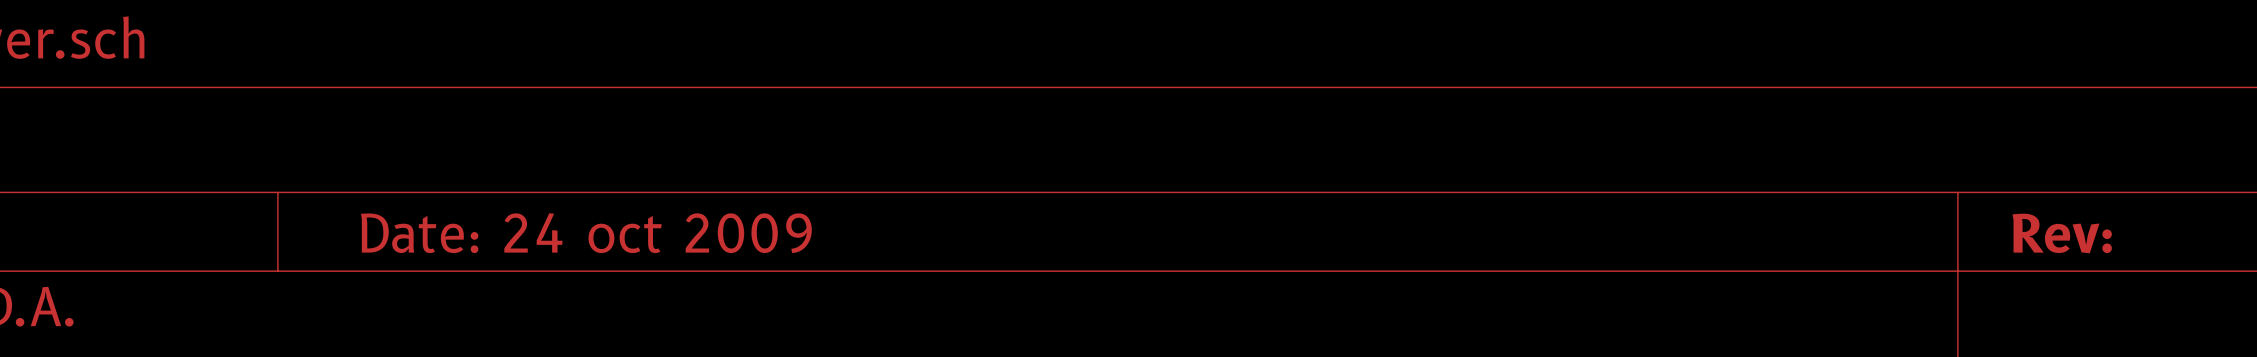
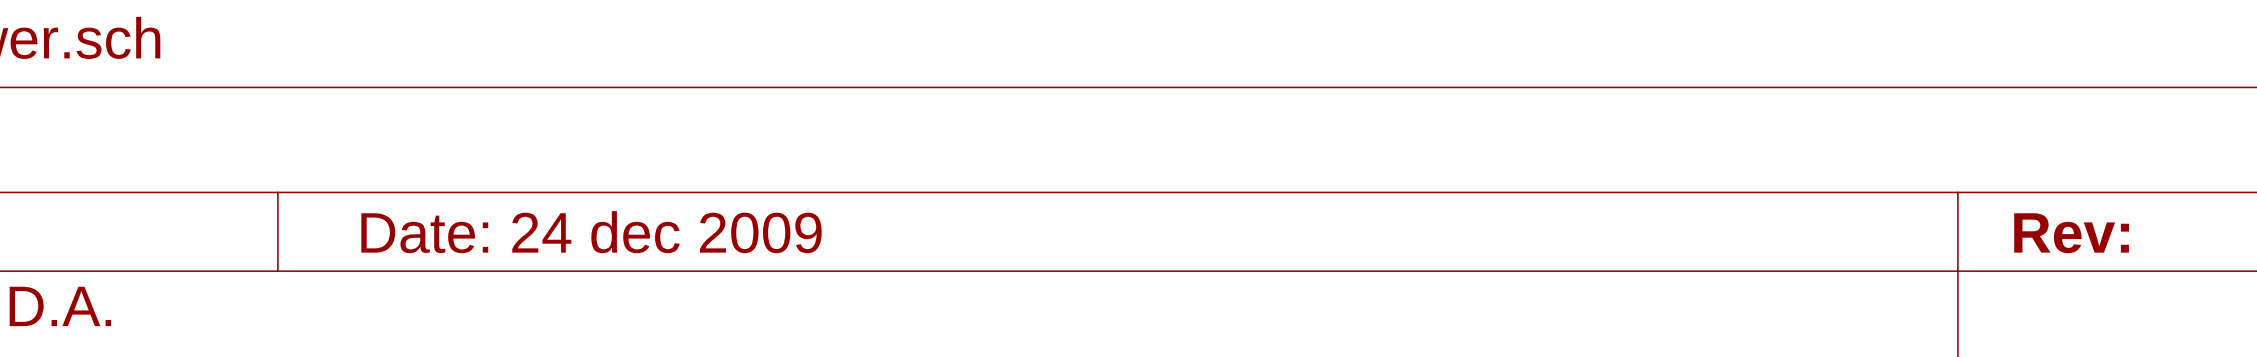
title block: Date: 24 oct 2009 (586, 233) -> Date: 24 dec 2009 (591, 232)

